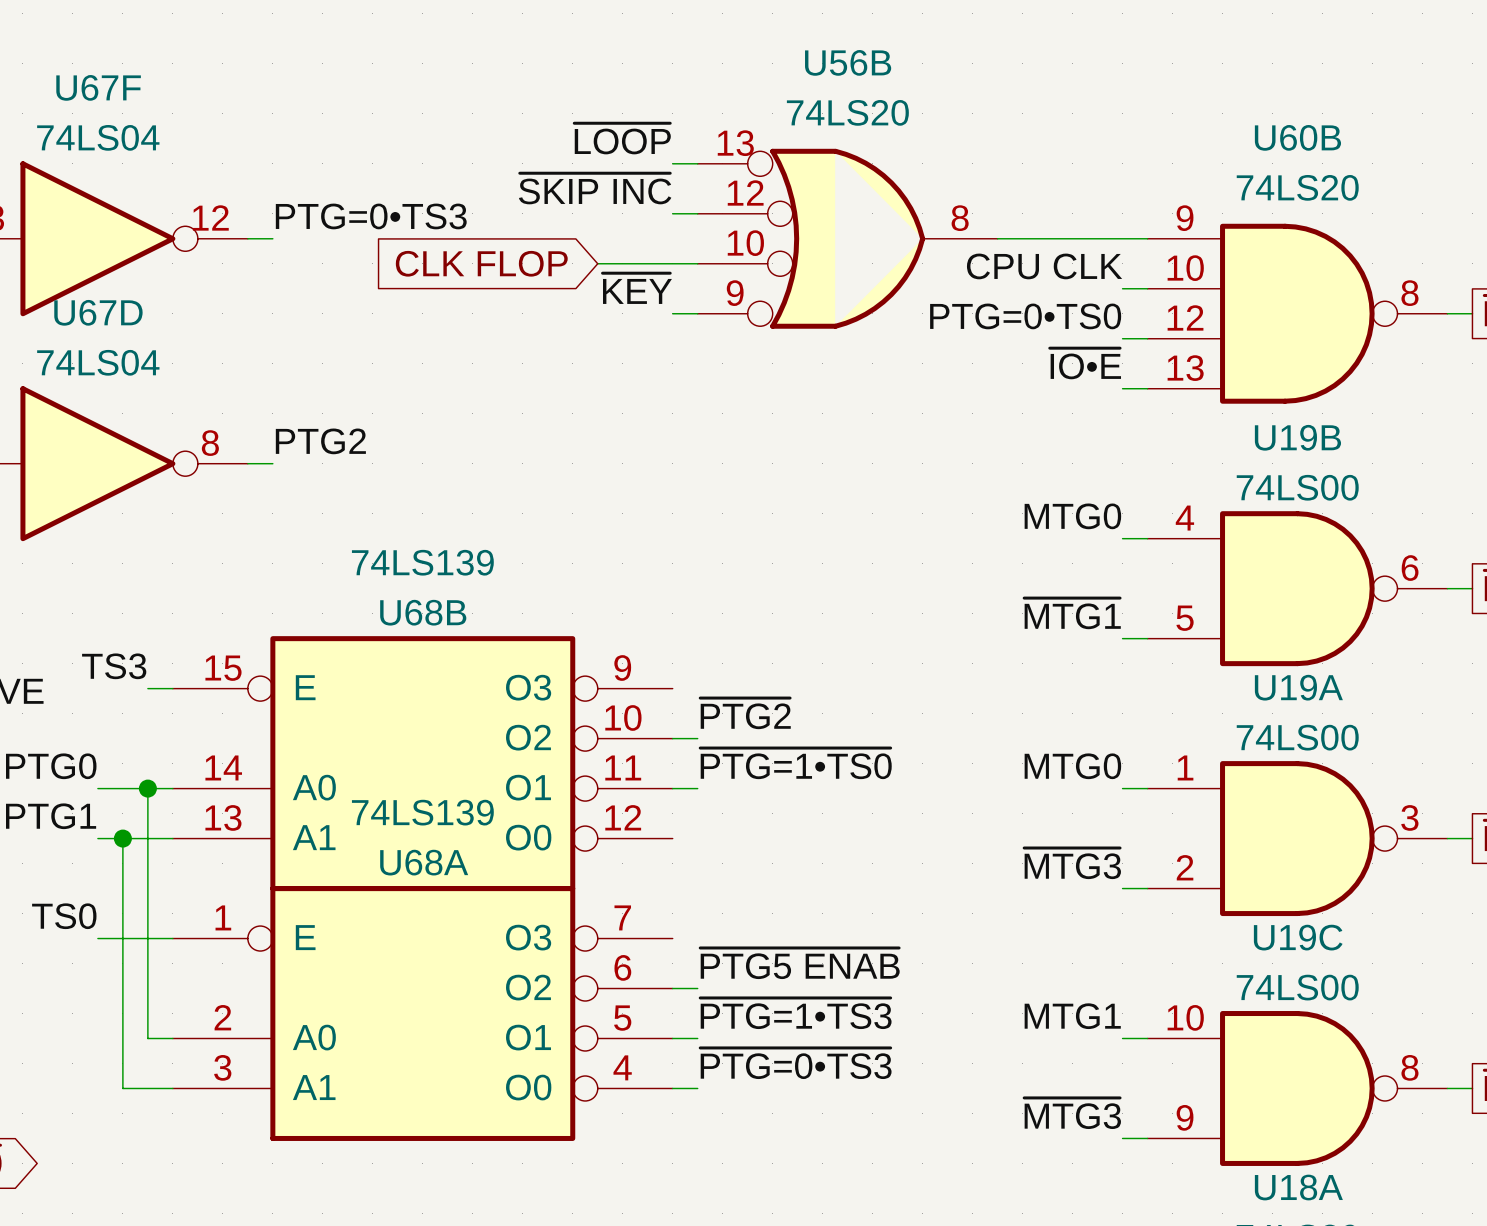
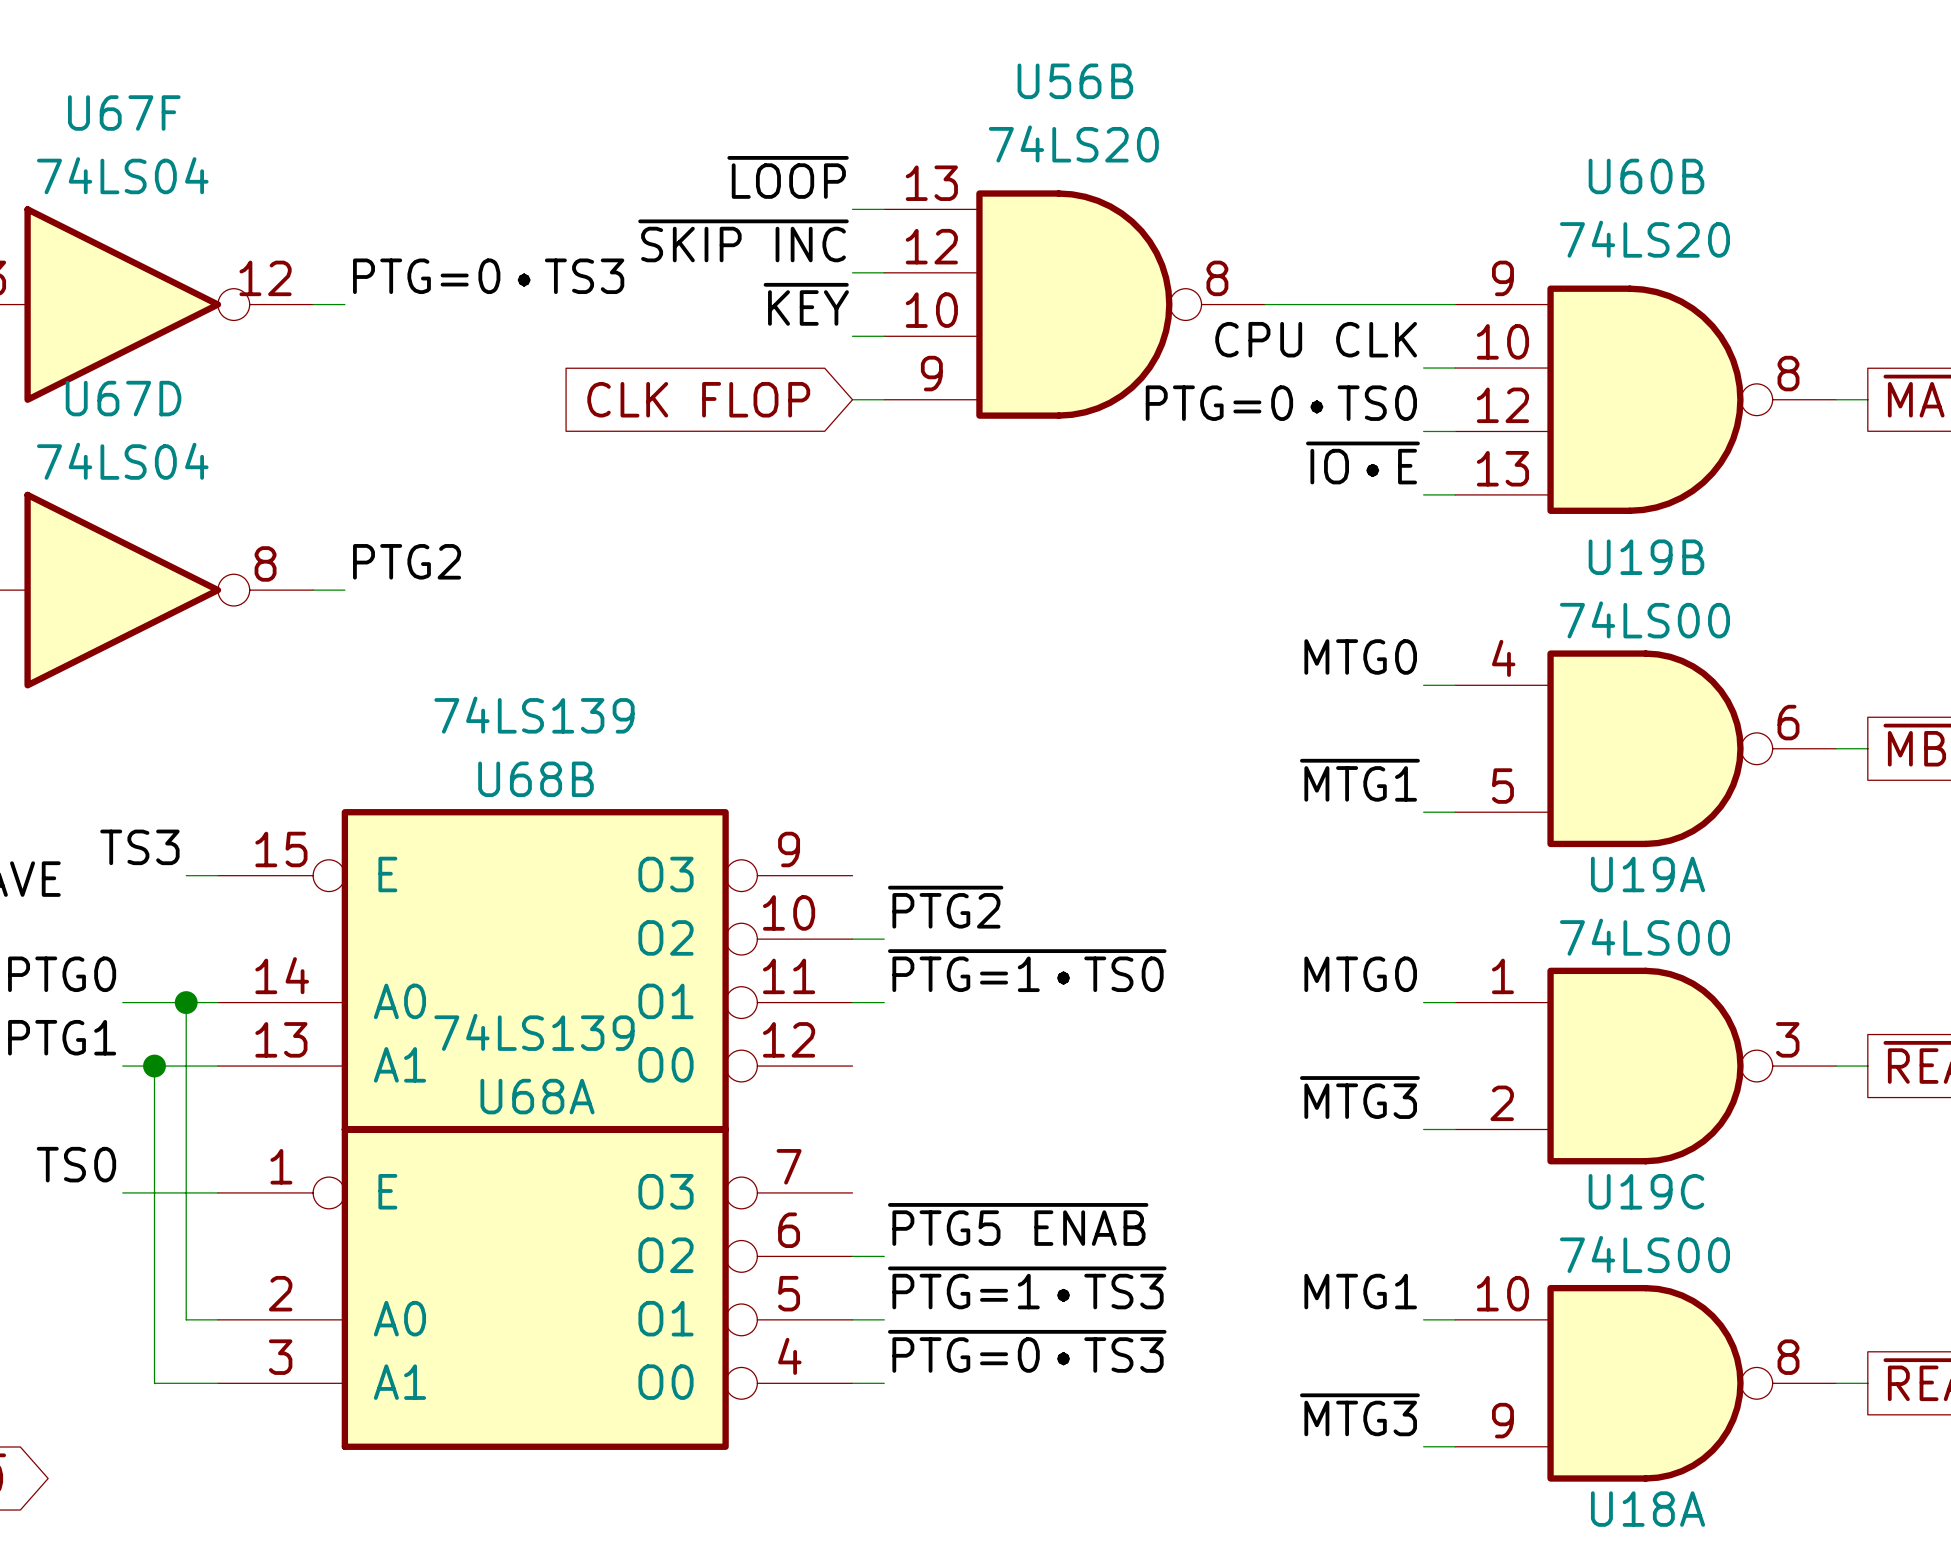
U56B symbol: [697, 148, 998, 329] -> [884, 190, 1265, 419]
global label position: CLK FLOP (481, 263) -> CLK FLOP (698, 399)
wire: (597, 263) (672, 263) -> none
label position: ~{KEY} (637, 288) -> ~{KEY} (806, 304)

